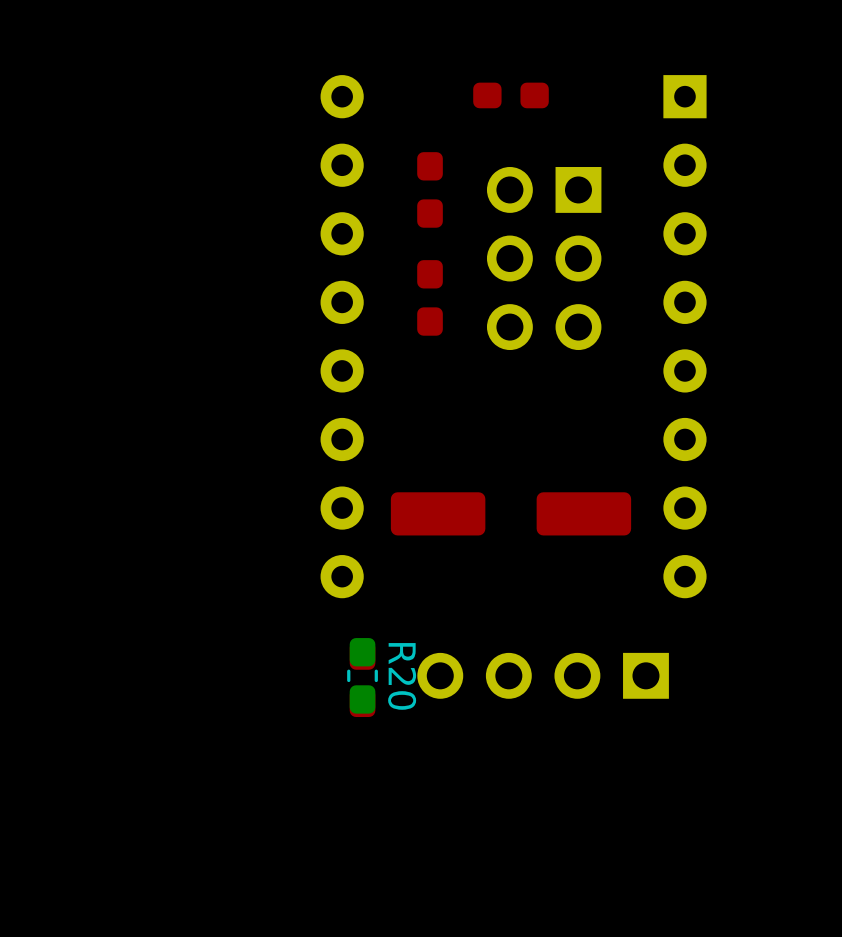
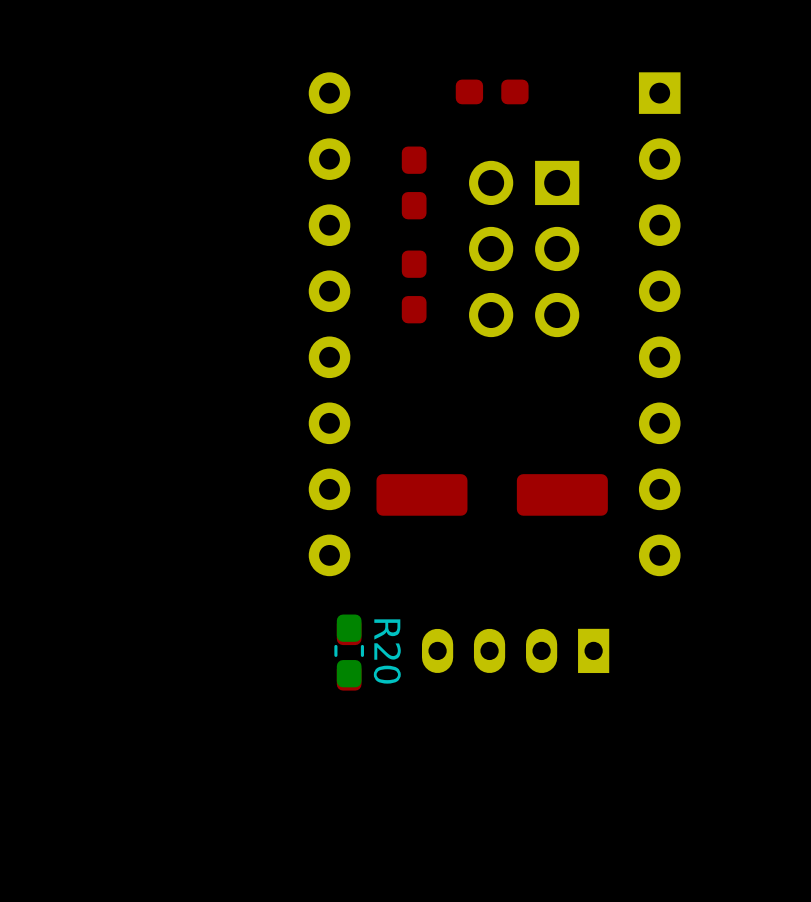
part footprint: [417, 652, 669, 699] -> [421, 628, 610, 674]

